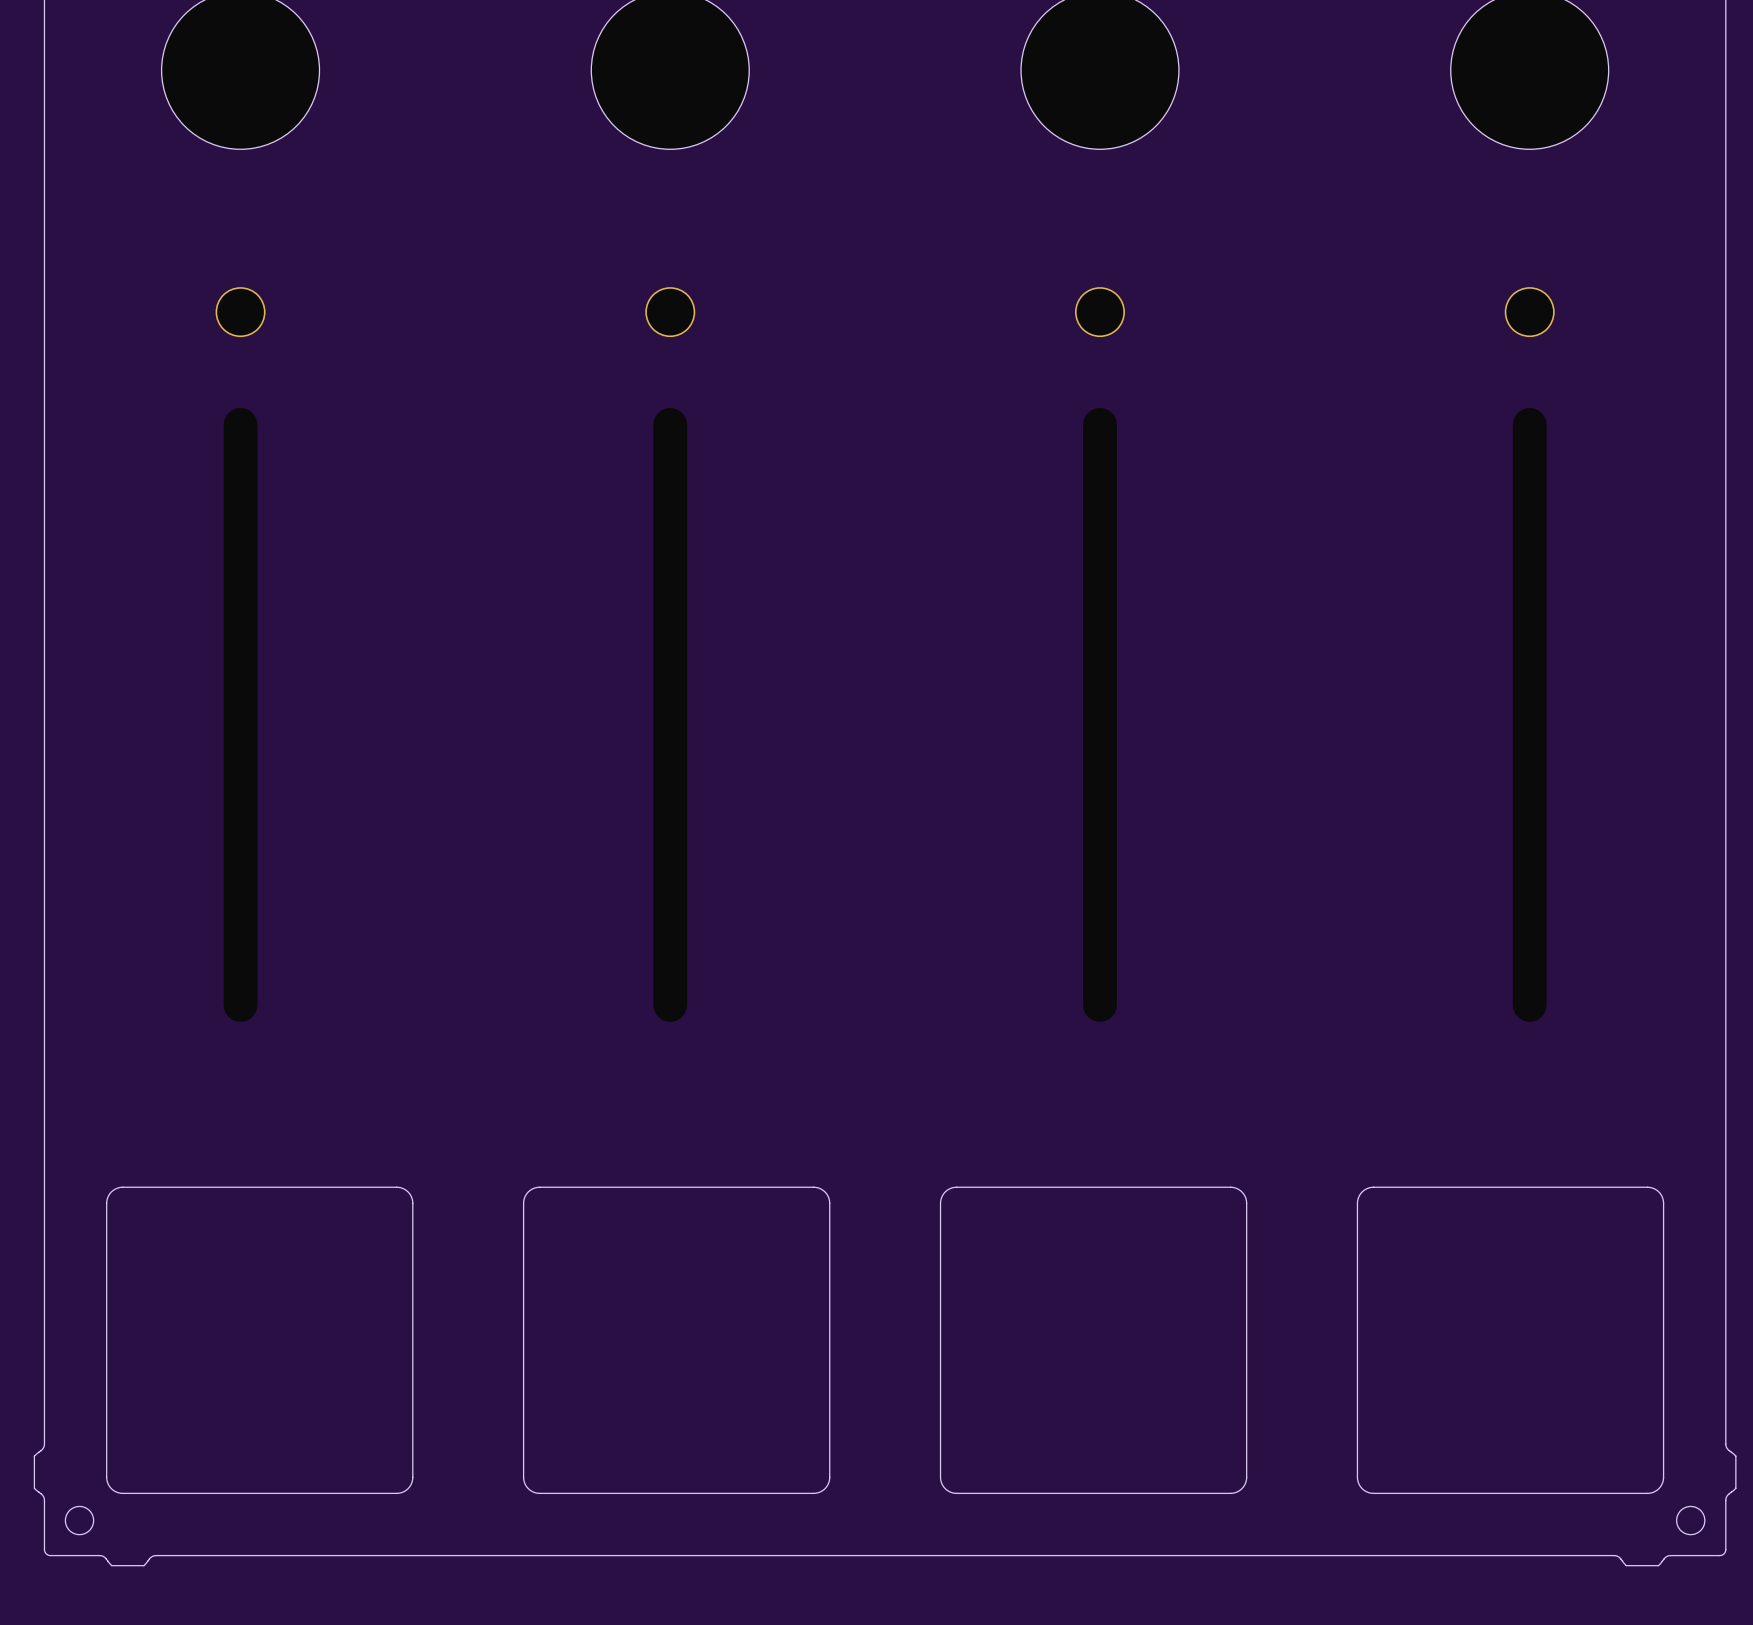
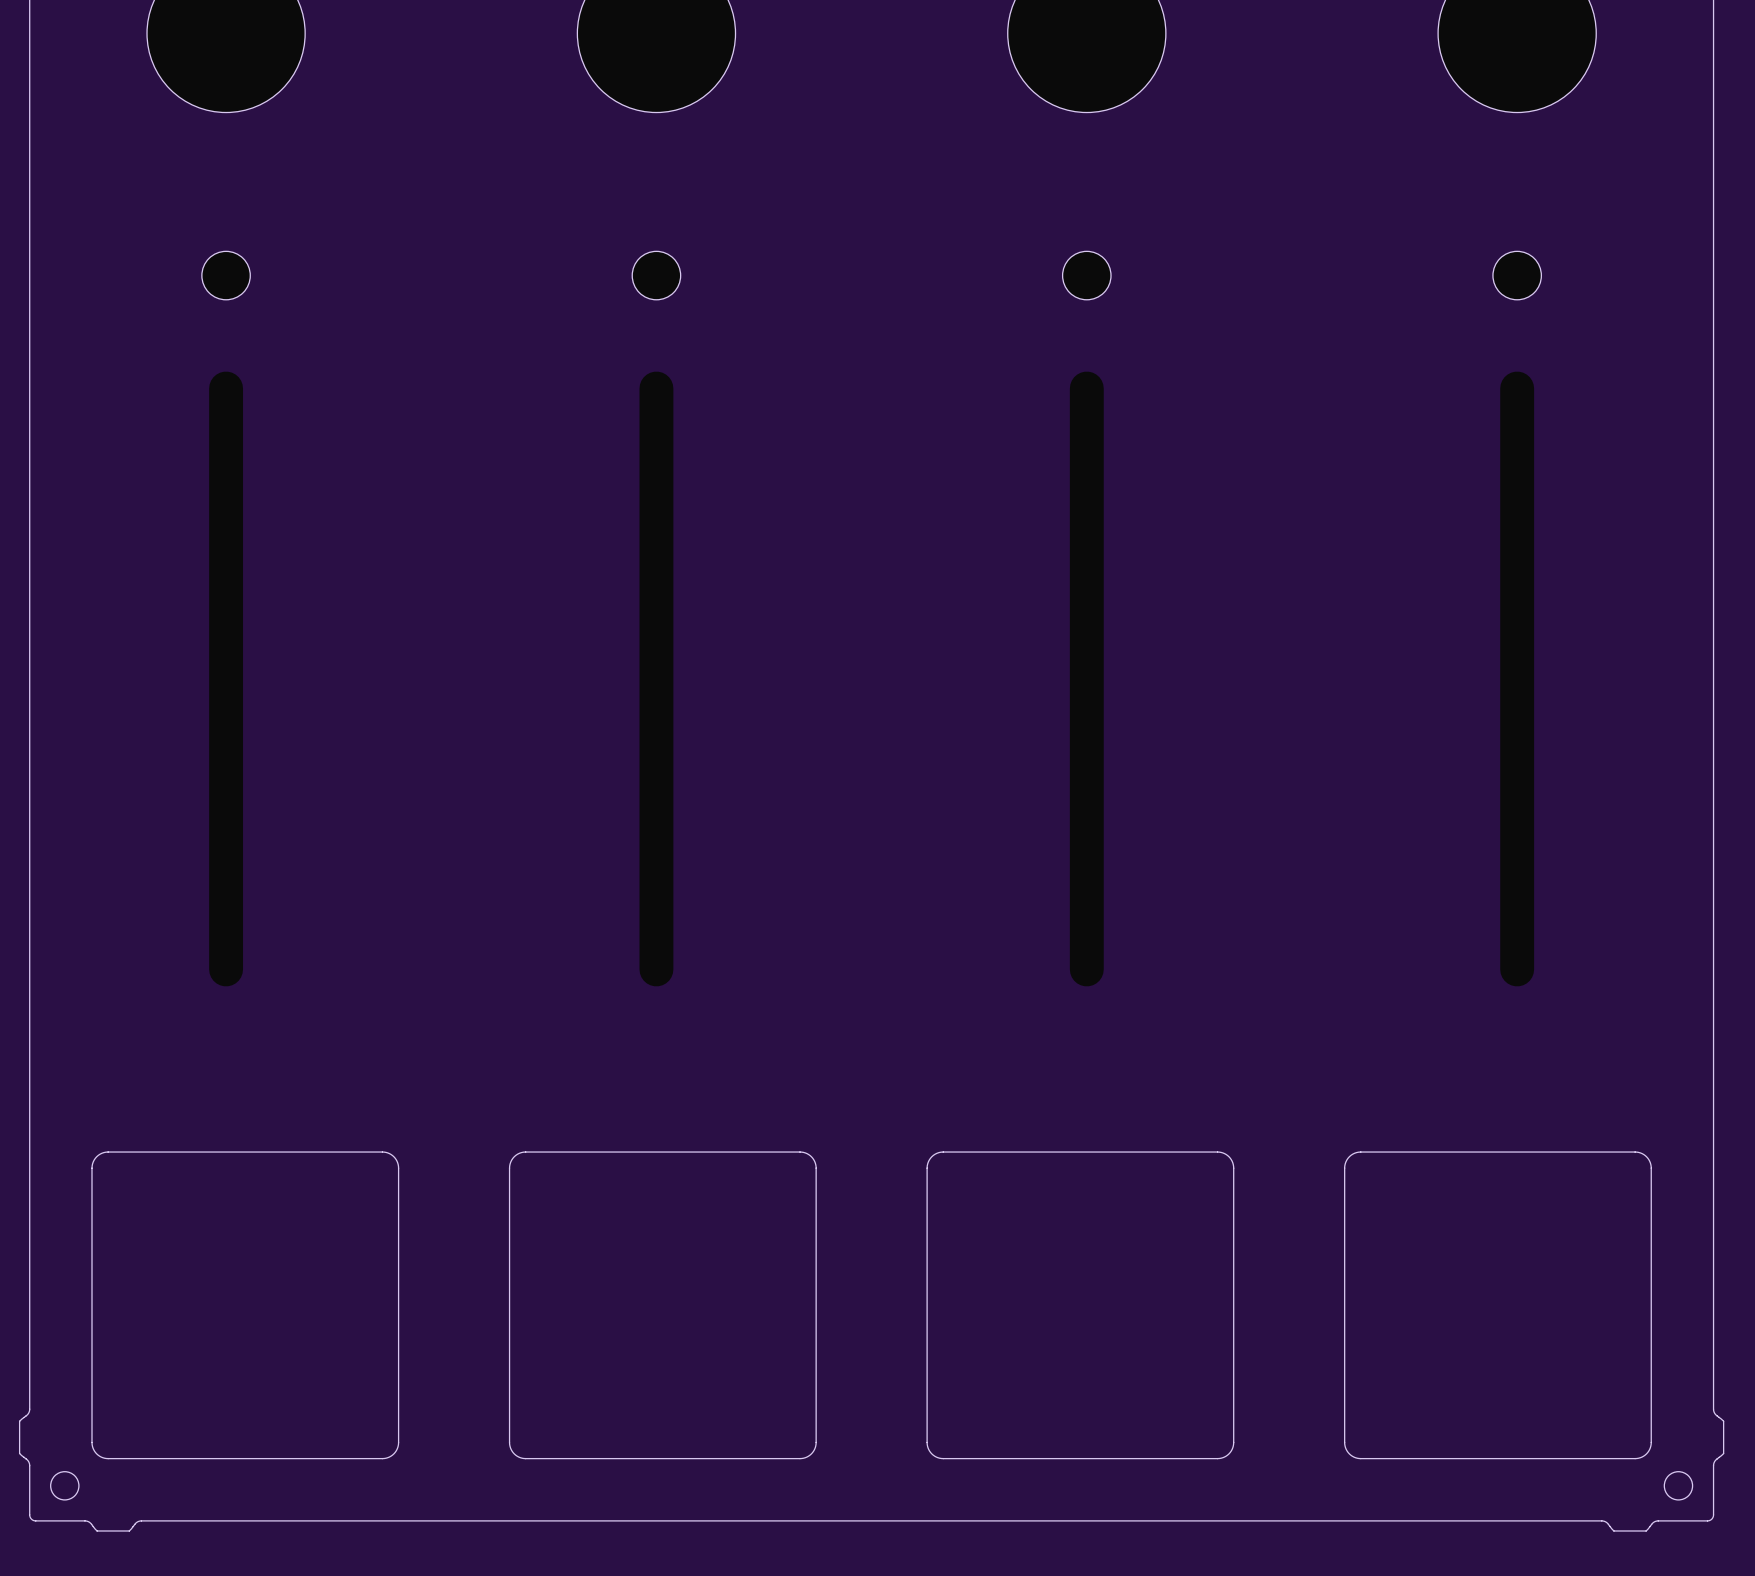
part footprint: [215, 287, 266, 338] -> [201, 251, 251, 300]
part footprint: [645, 287, 696, 338] -> [632, 251, 681, 300]
part footprint: [1075, 287, 1125, 338] -> [1062, 251, 1112, 300]
part footprint: [1504, 287, 1555, 338] -> [1492, 251, 1542, 300]

